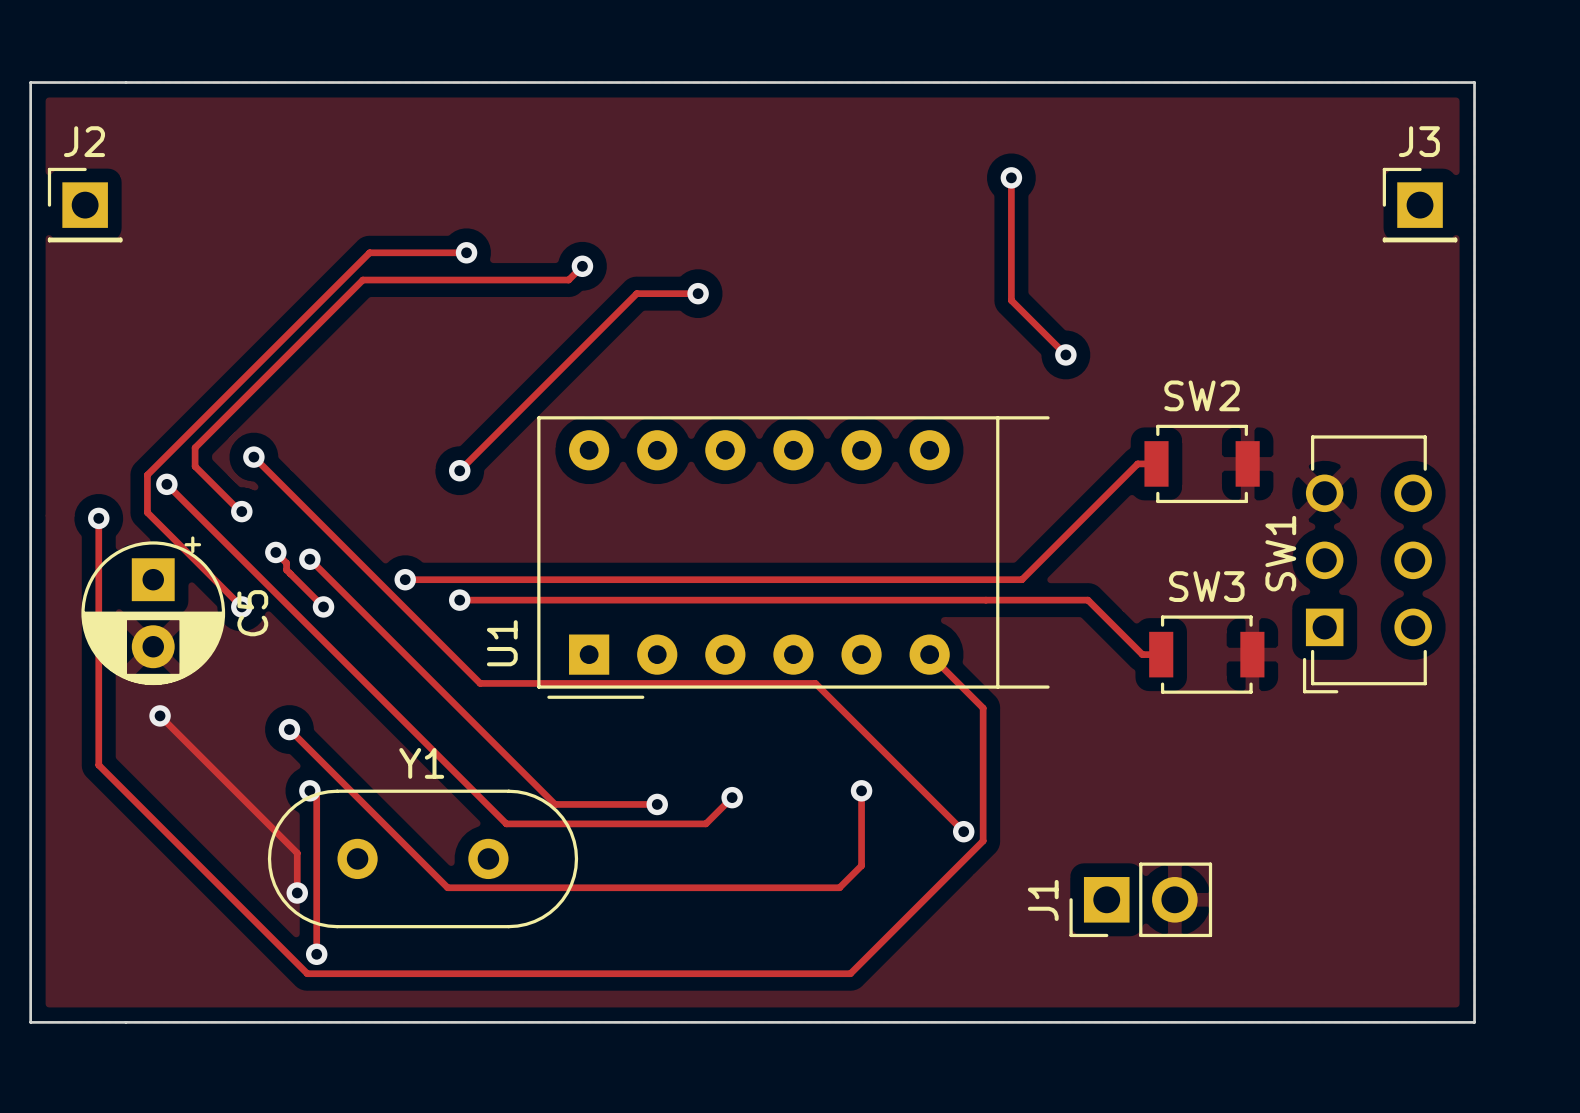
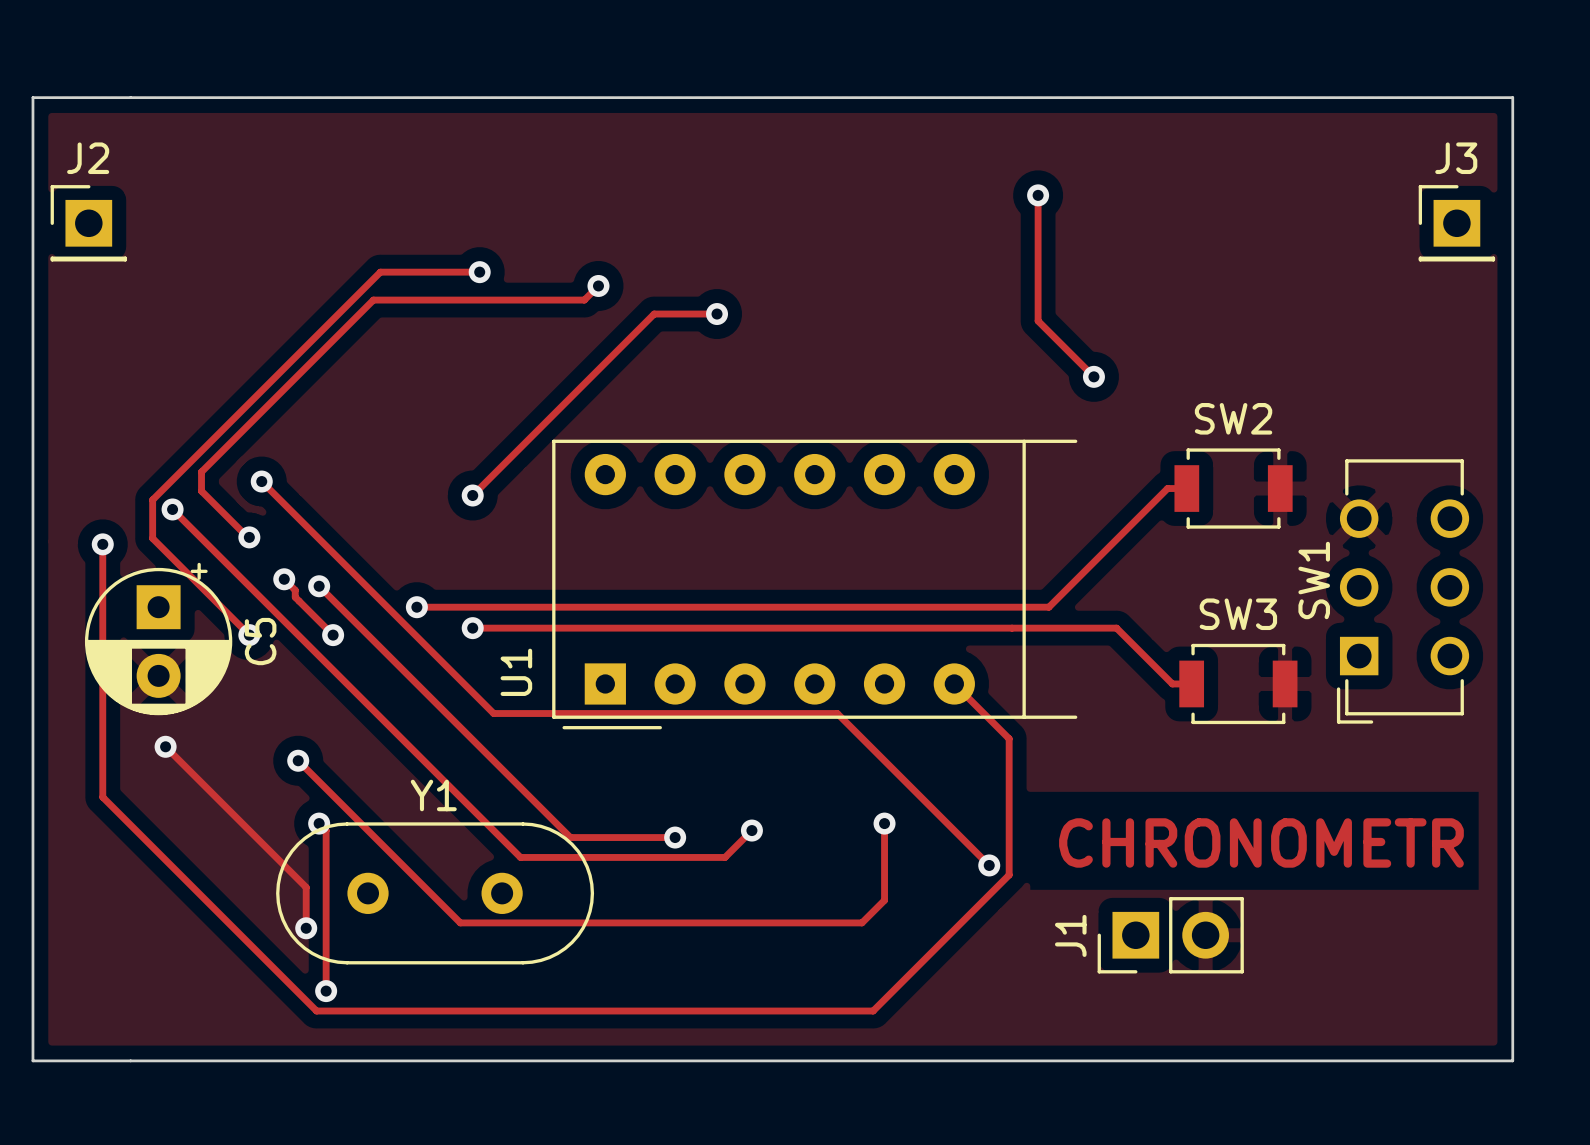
text: none -> CHRONOMETR (1261, 842)

